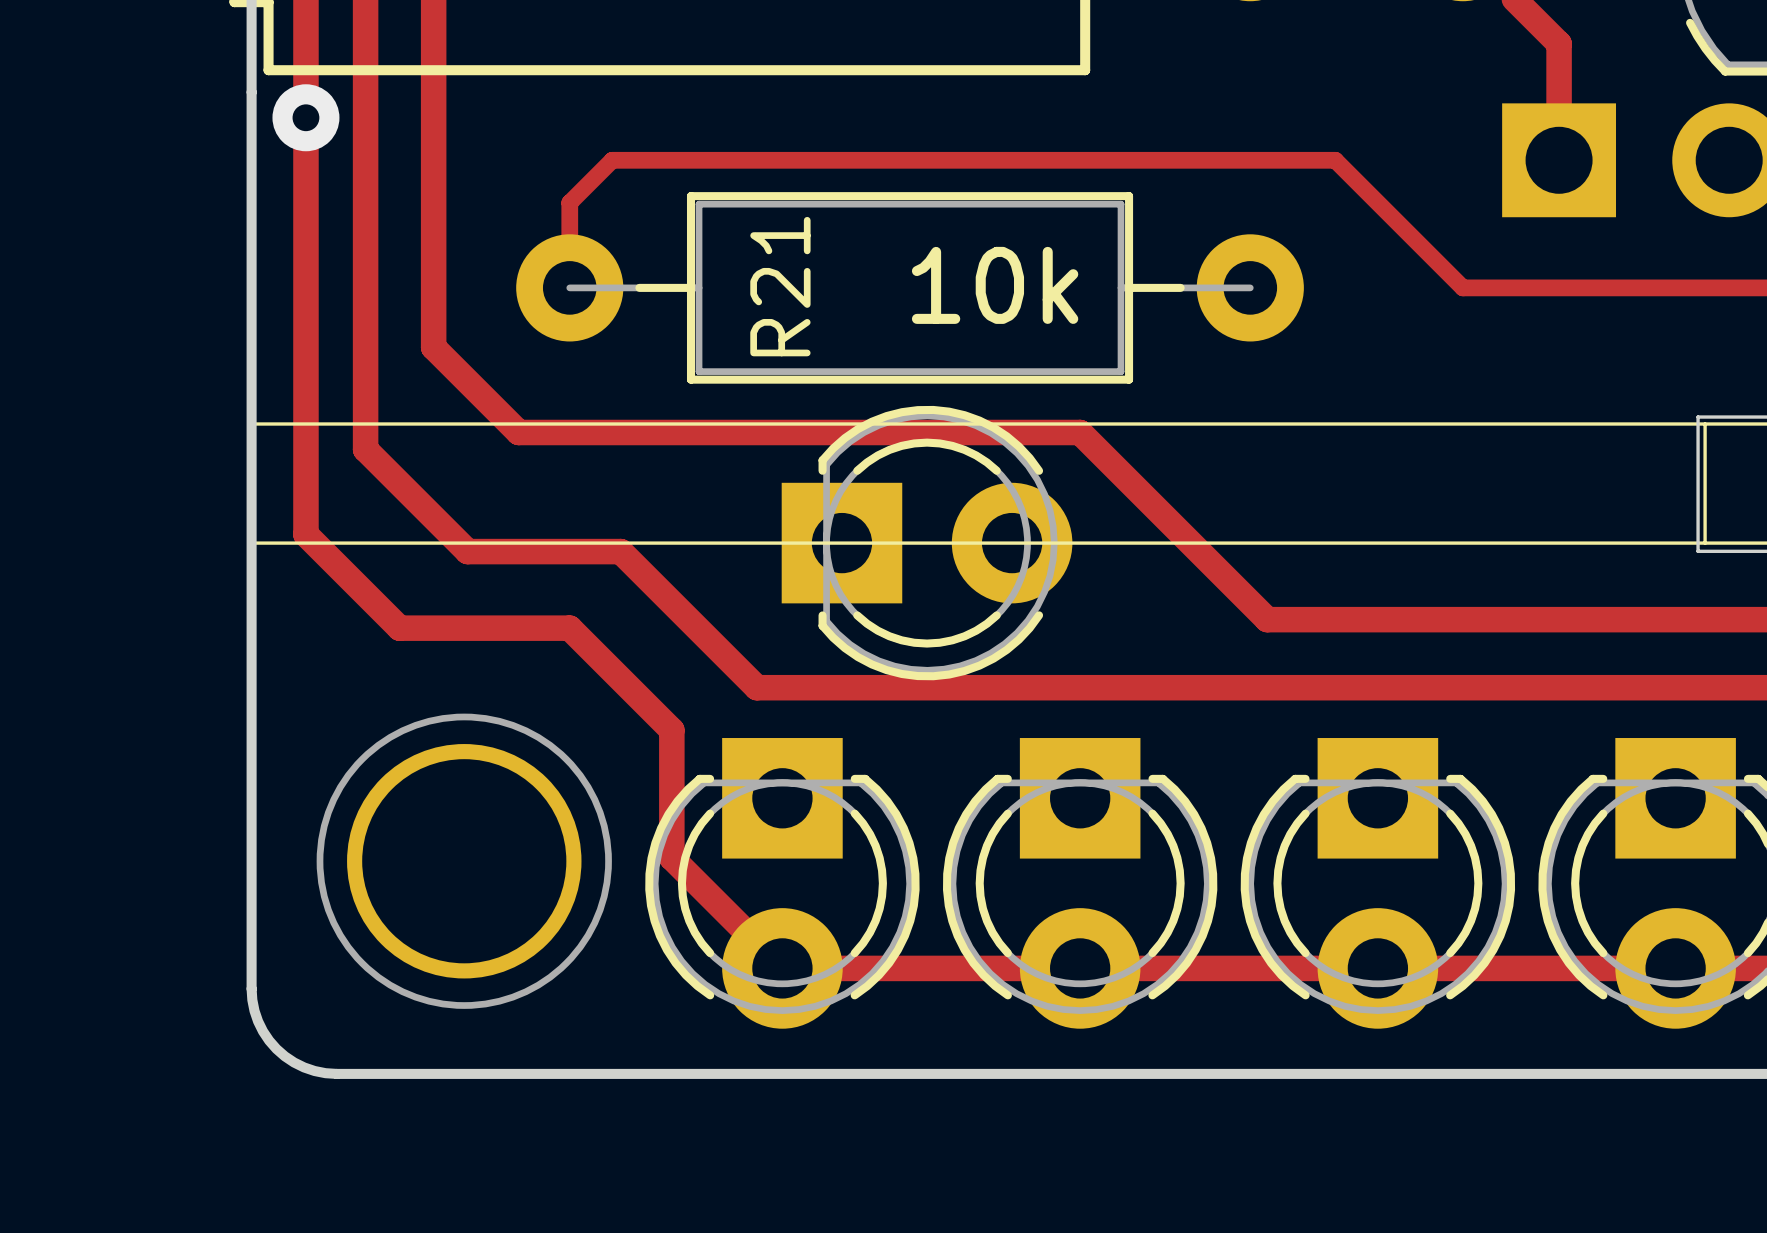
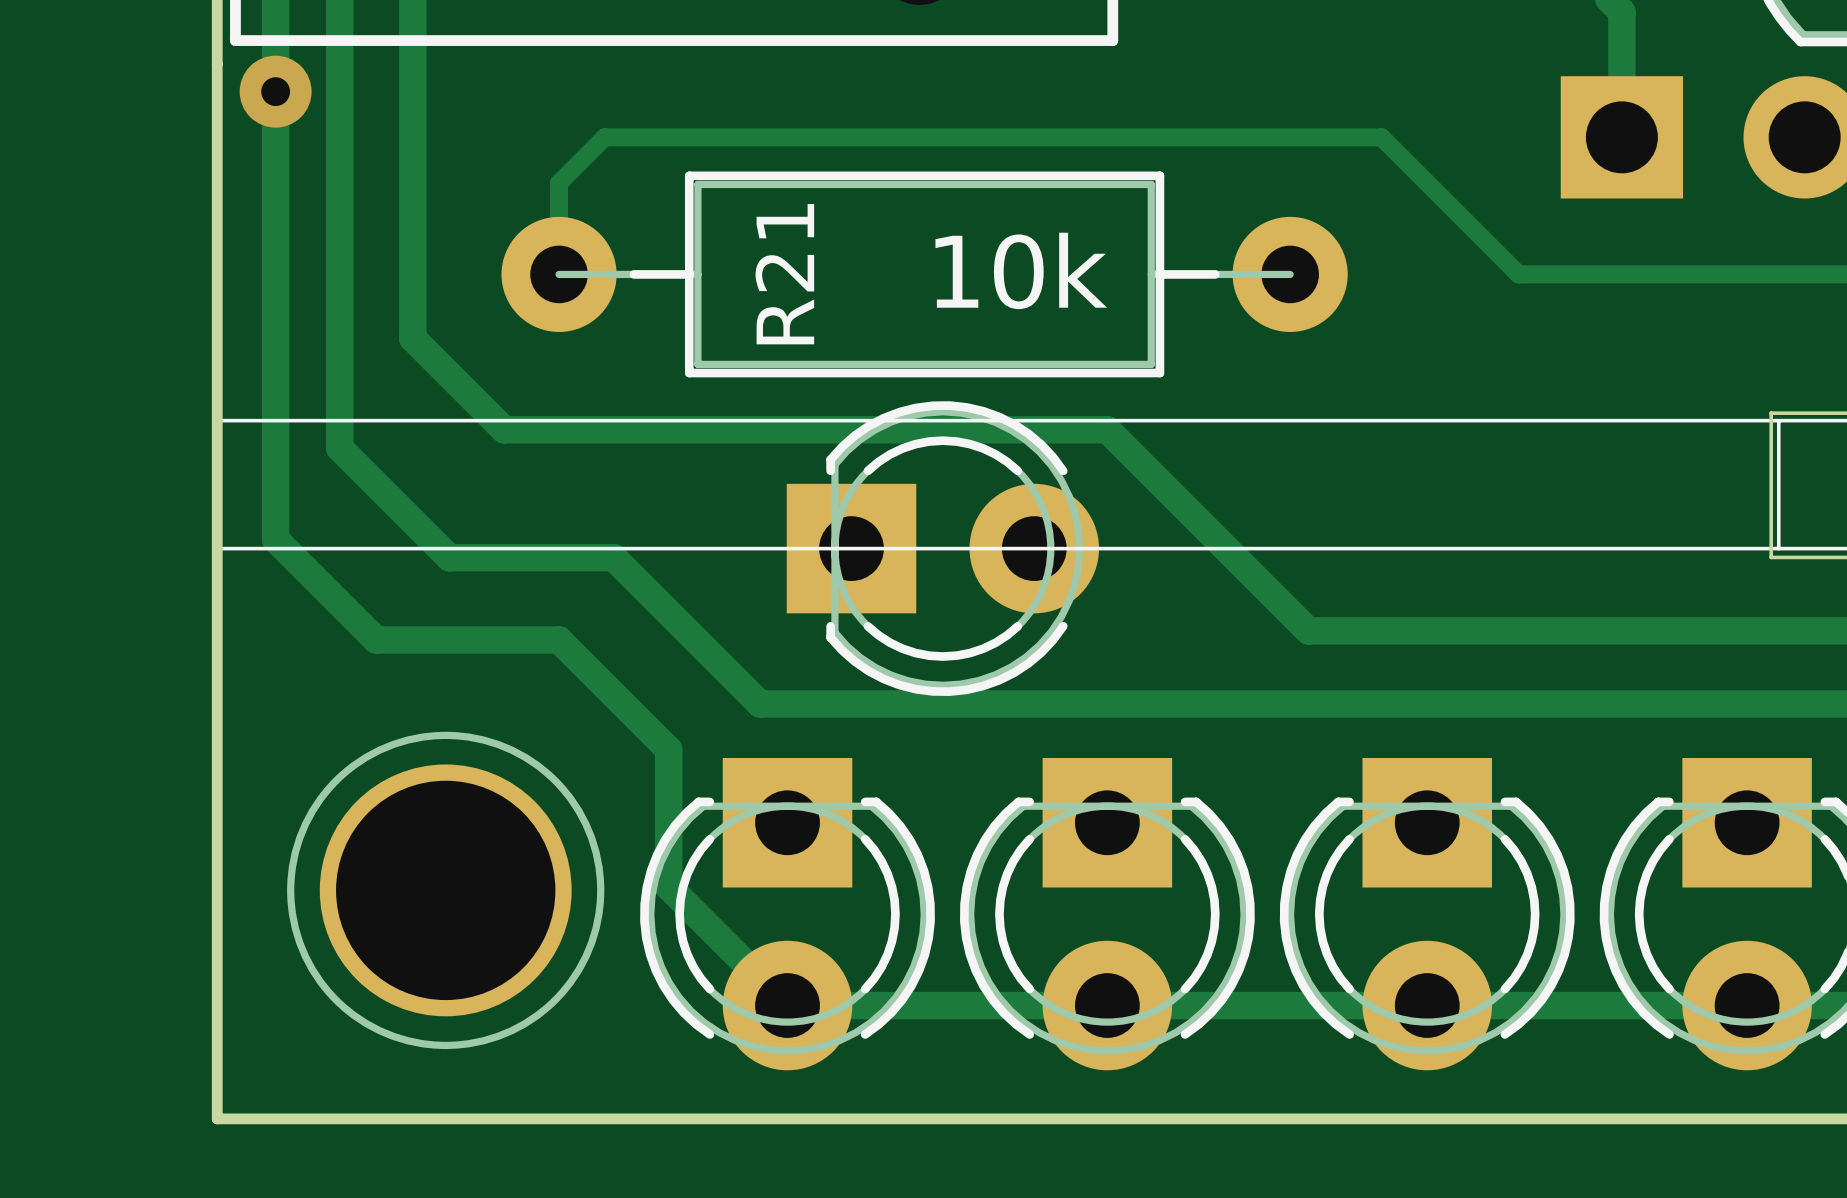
board edge: (251, 988) (258, 1021) (276, 1049) (304, 1067) (336, 1073) -> (217, 1027) (217, 1118) (308, 1118)

